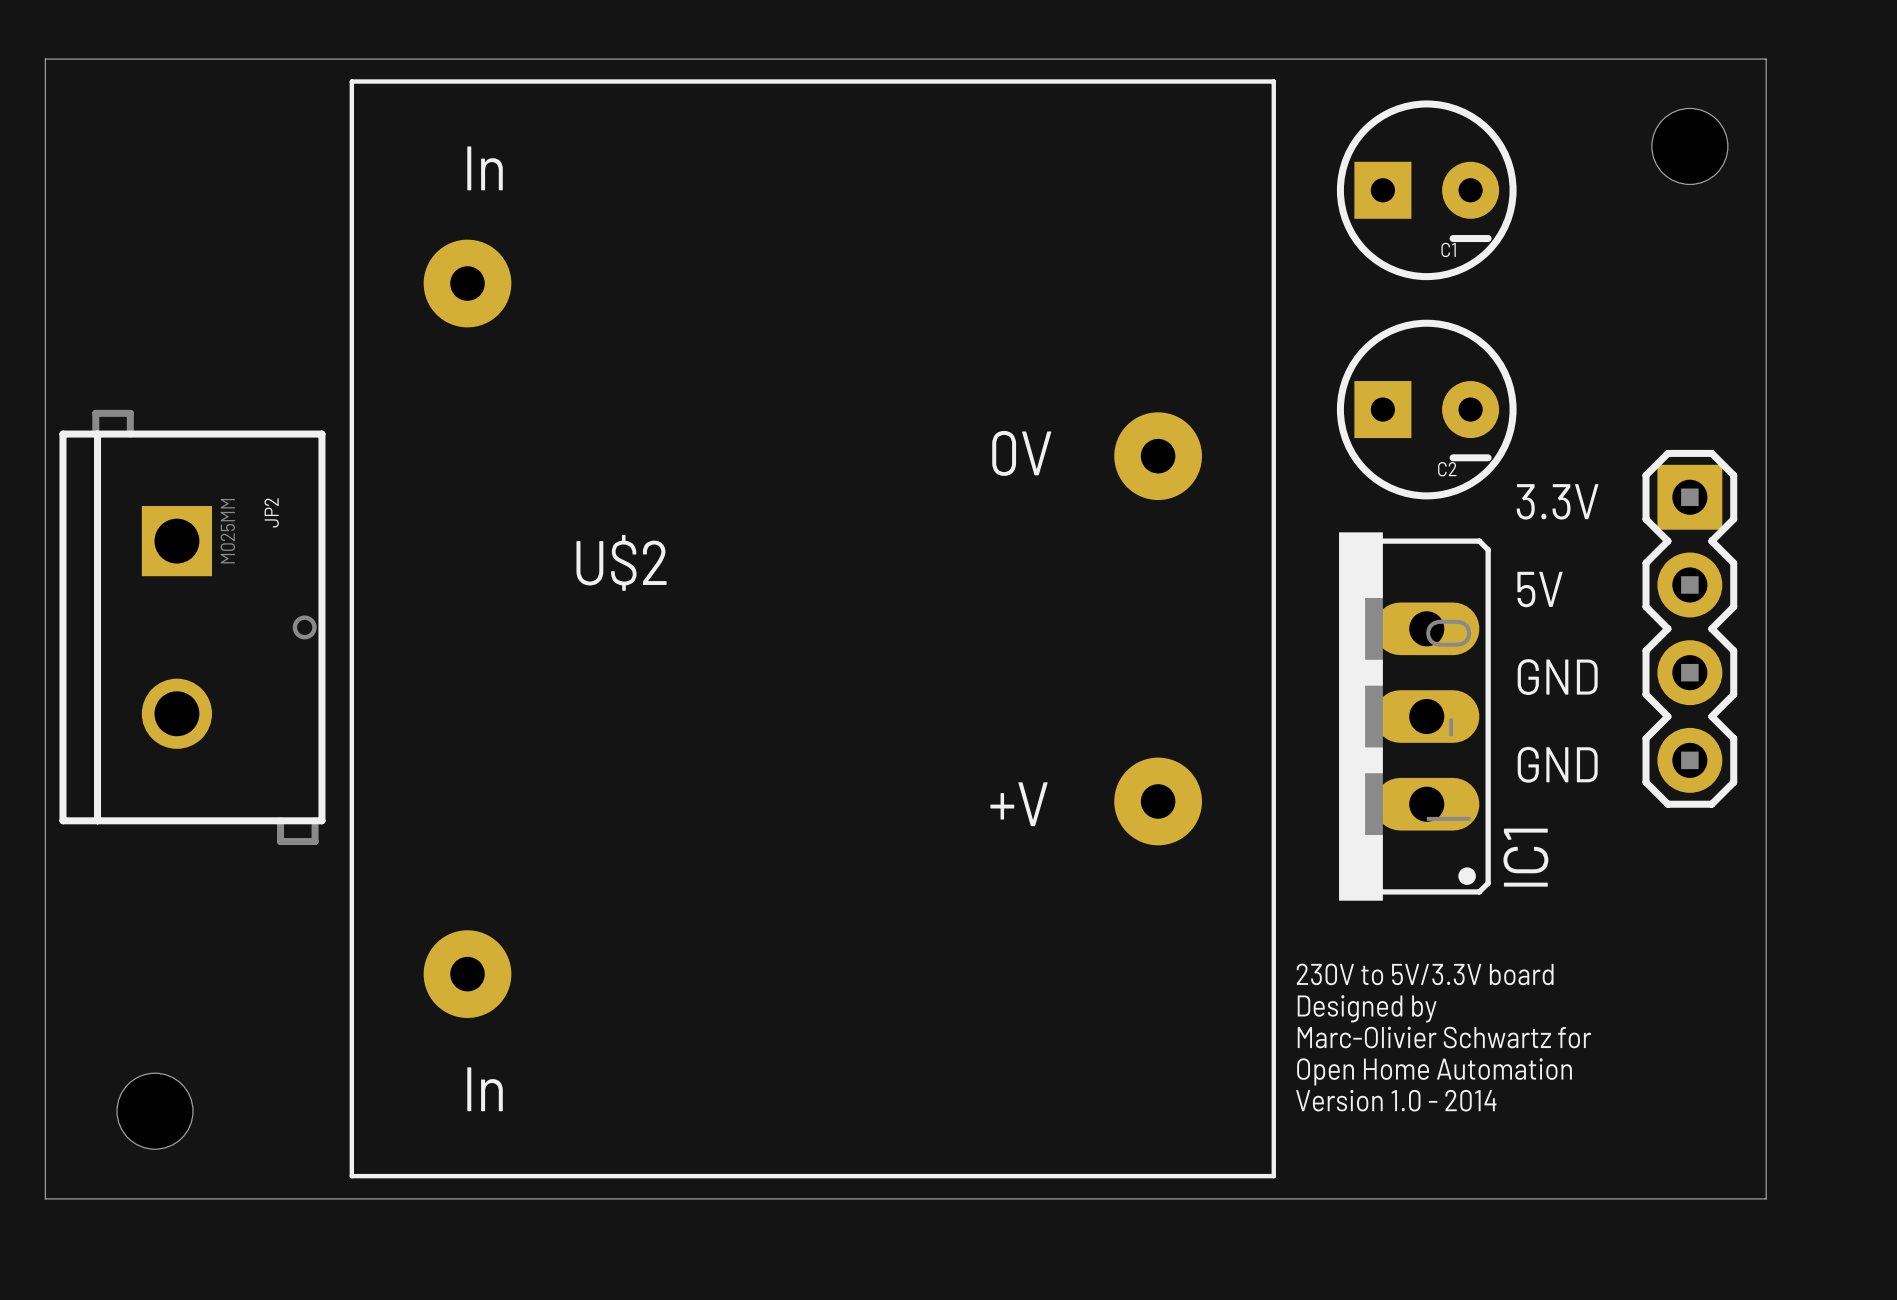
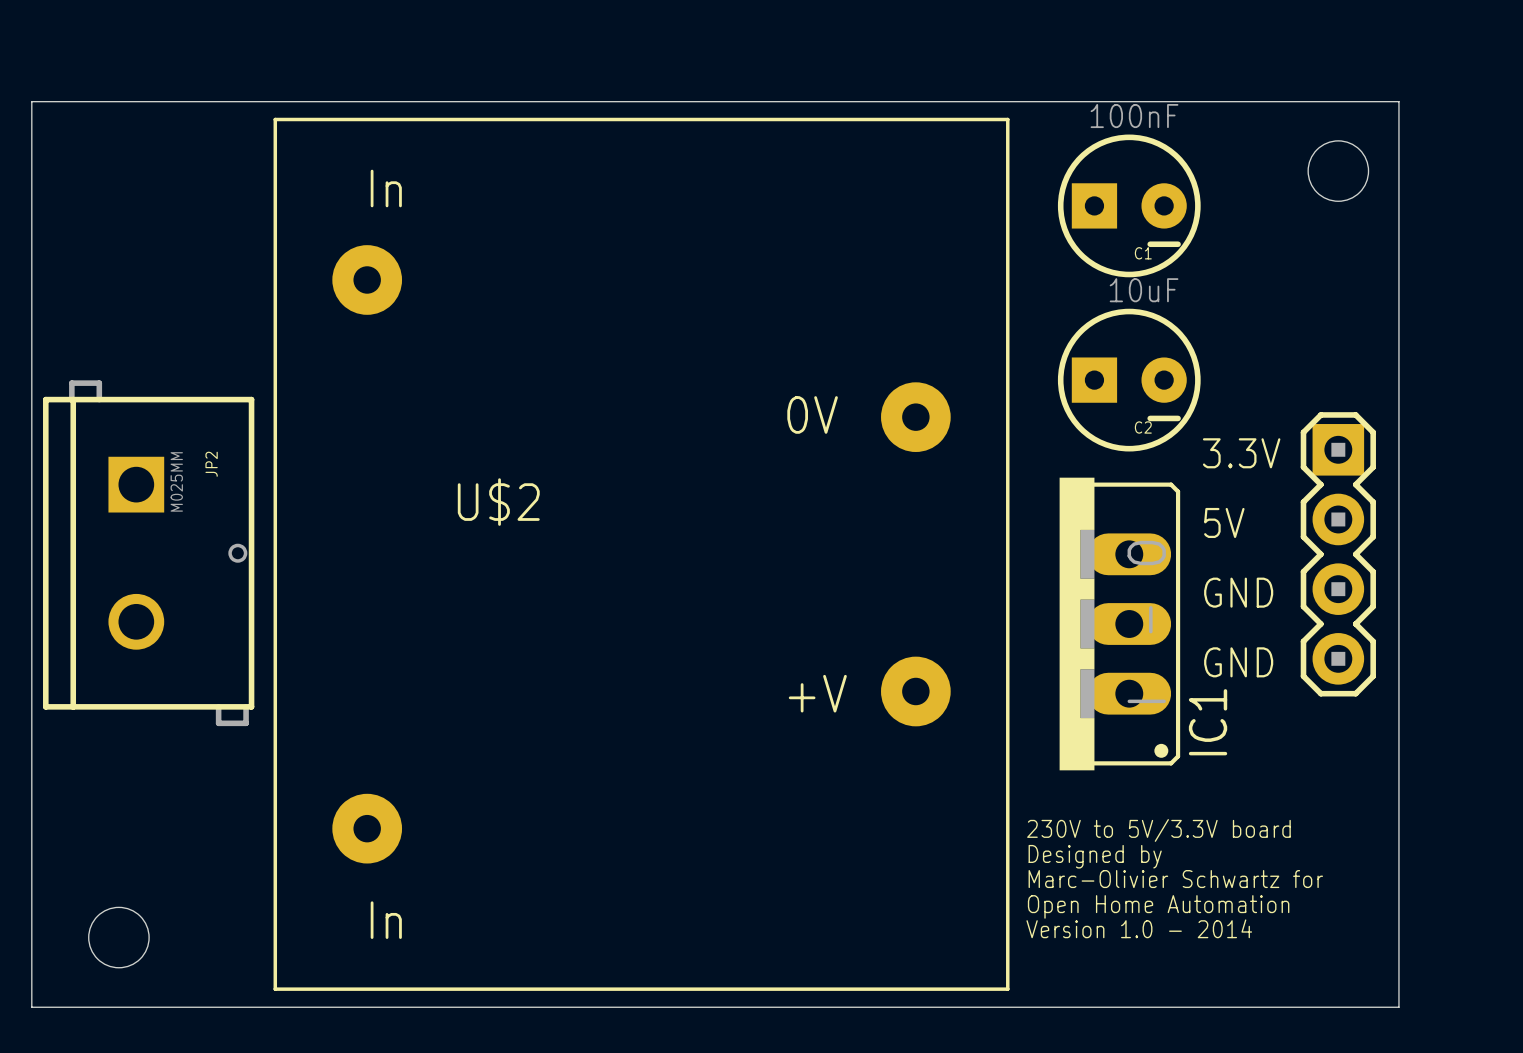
C1 value: none -> 100nF (1134, 116)
C2 value: none -> 10uF (1144, 290)

